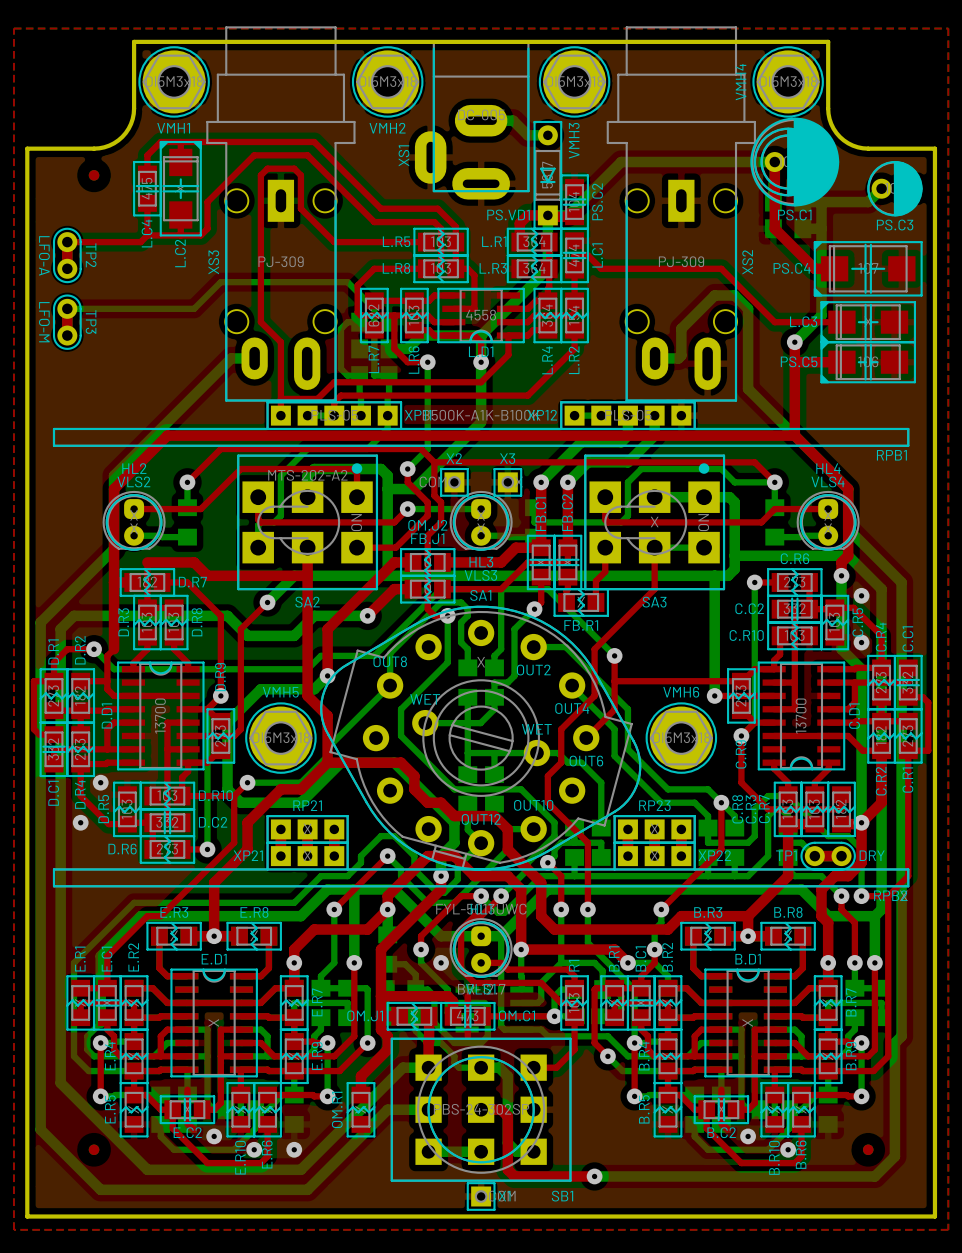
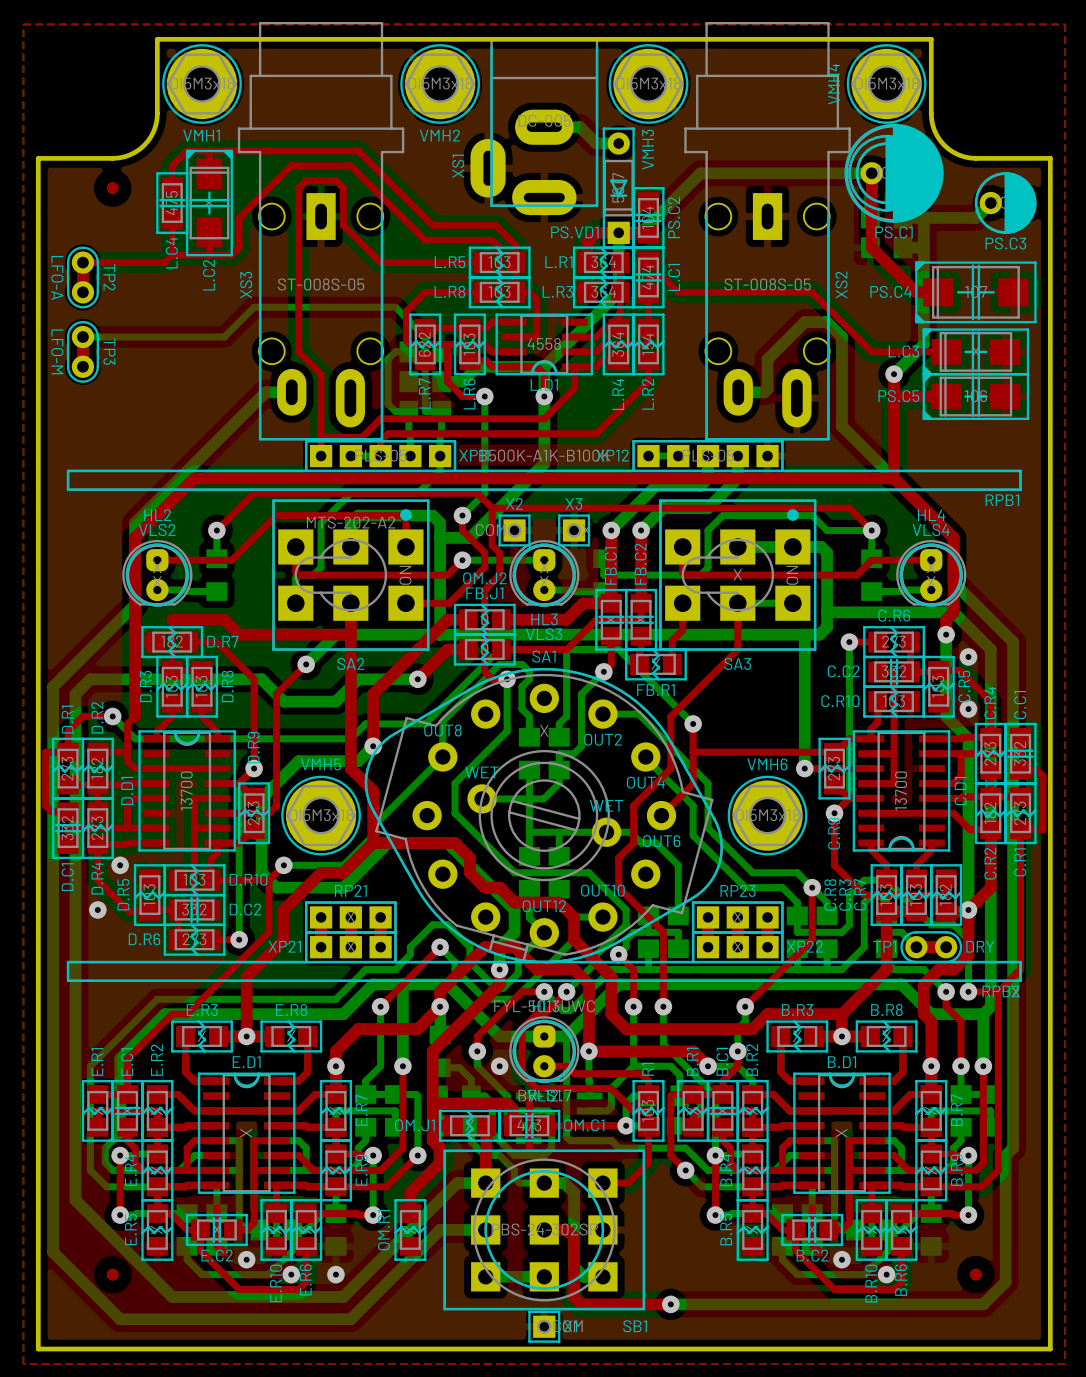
XS3 value: PJ-309 (281, 261) -> ST-008S-05 (321, 284)
XS2 value: PJ-309 (681, 261) -> ST-008S-05 (767, 284)

